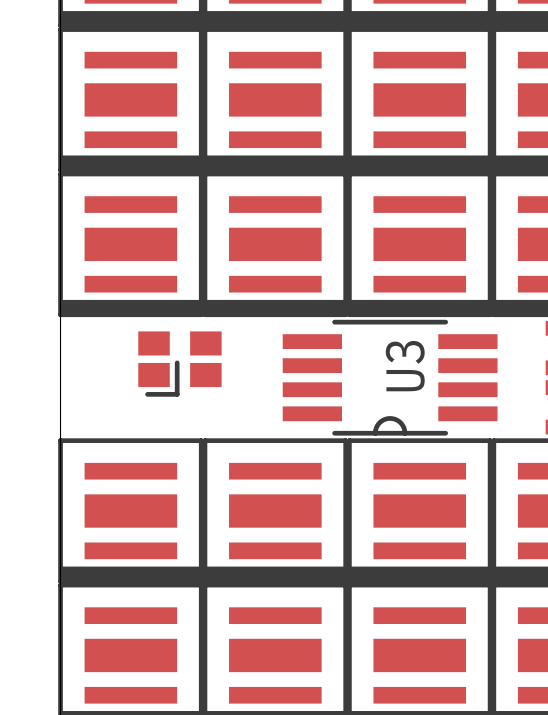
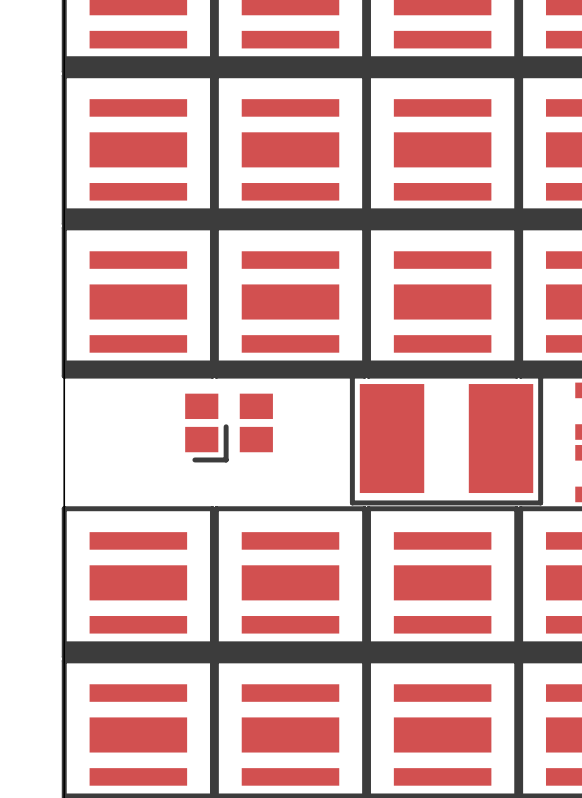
part position: (179, 364) -> (229, 428)
part: none -> (446, 438)
U3: (390, 377) -> none

